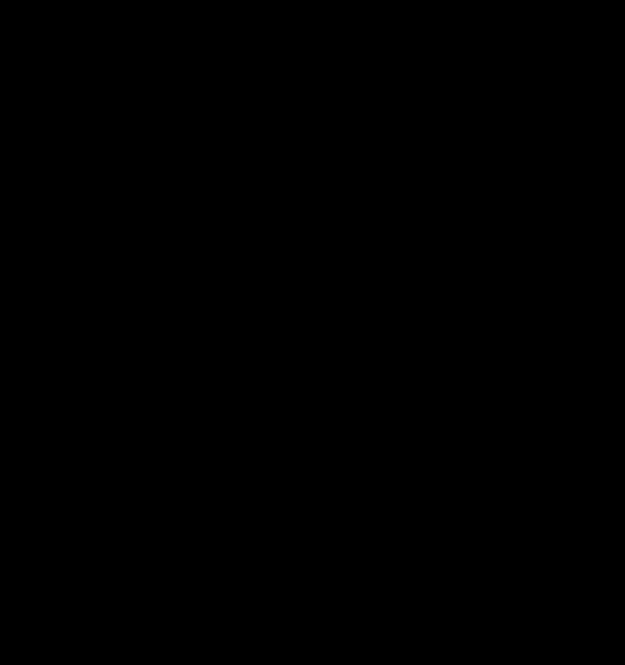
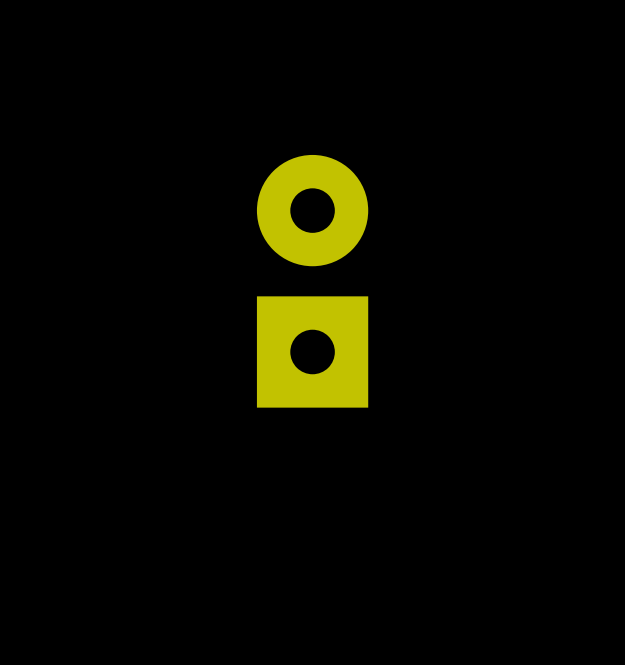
part: none -> (312, 281)

